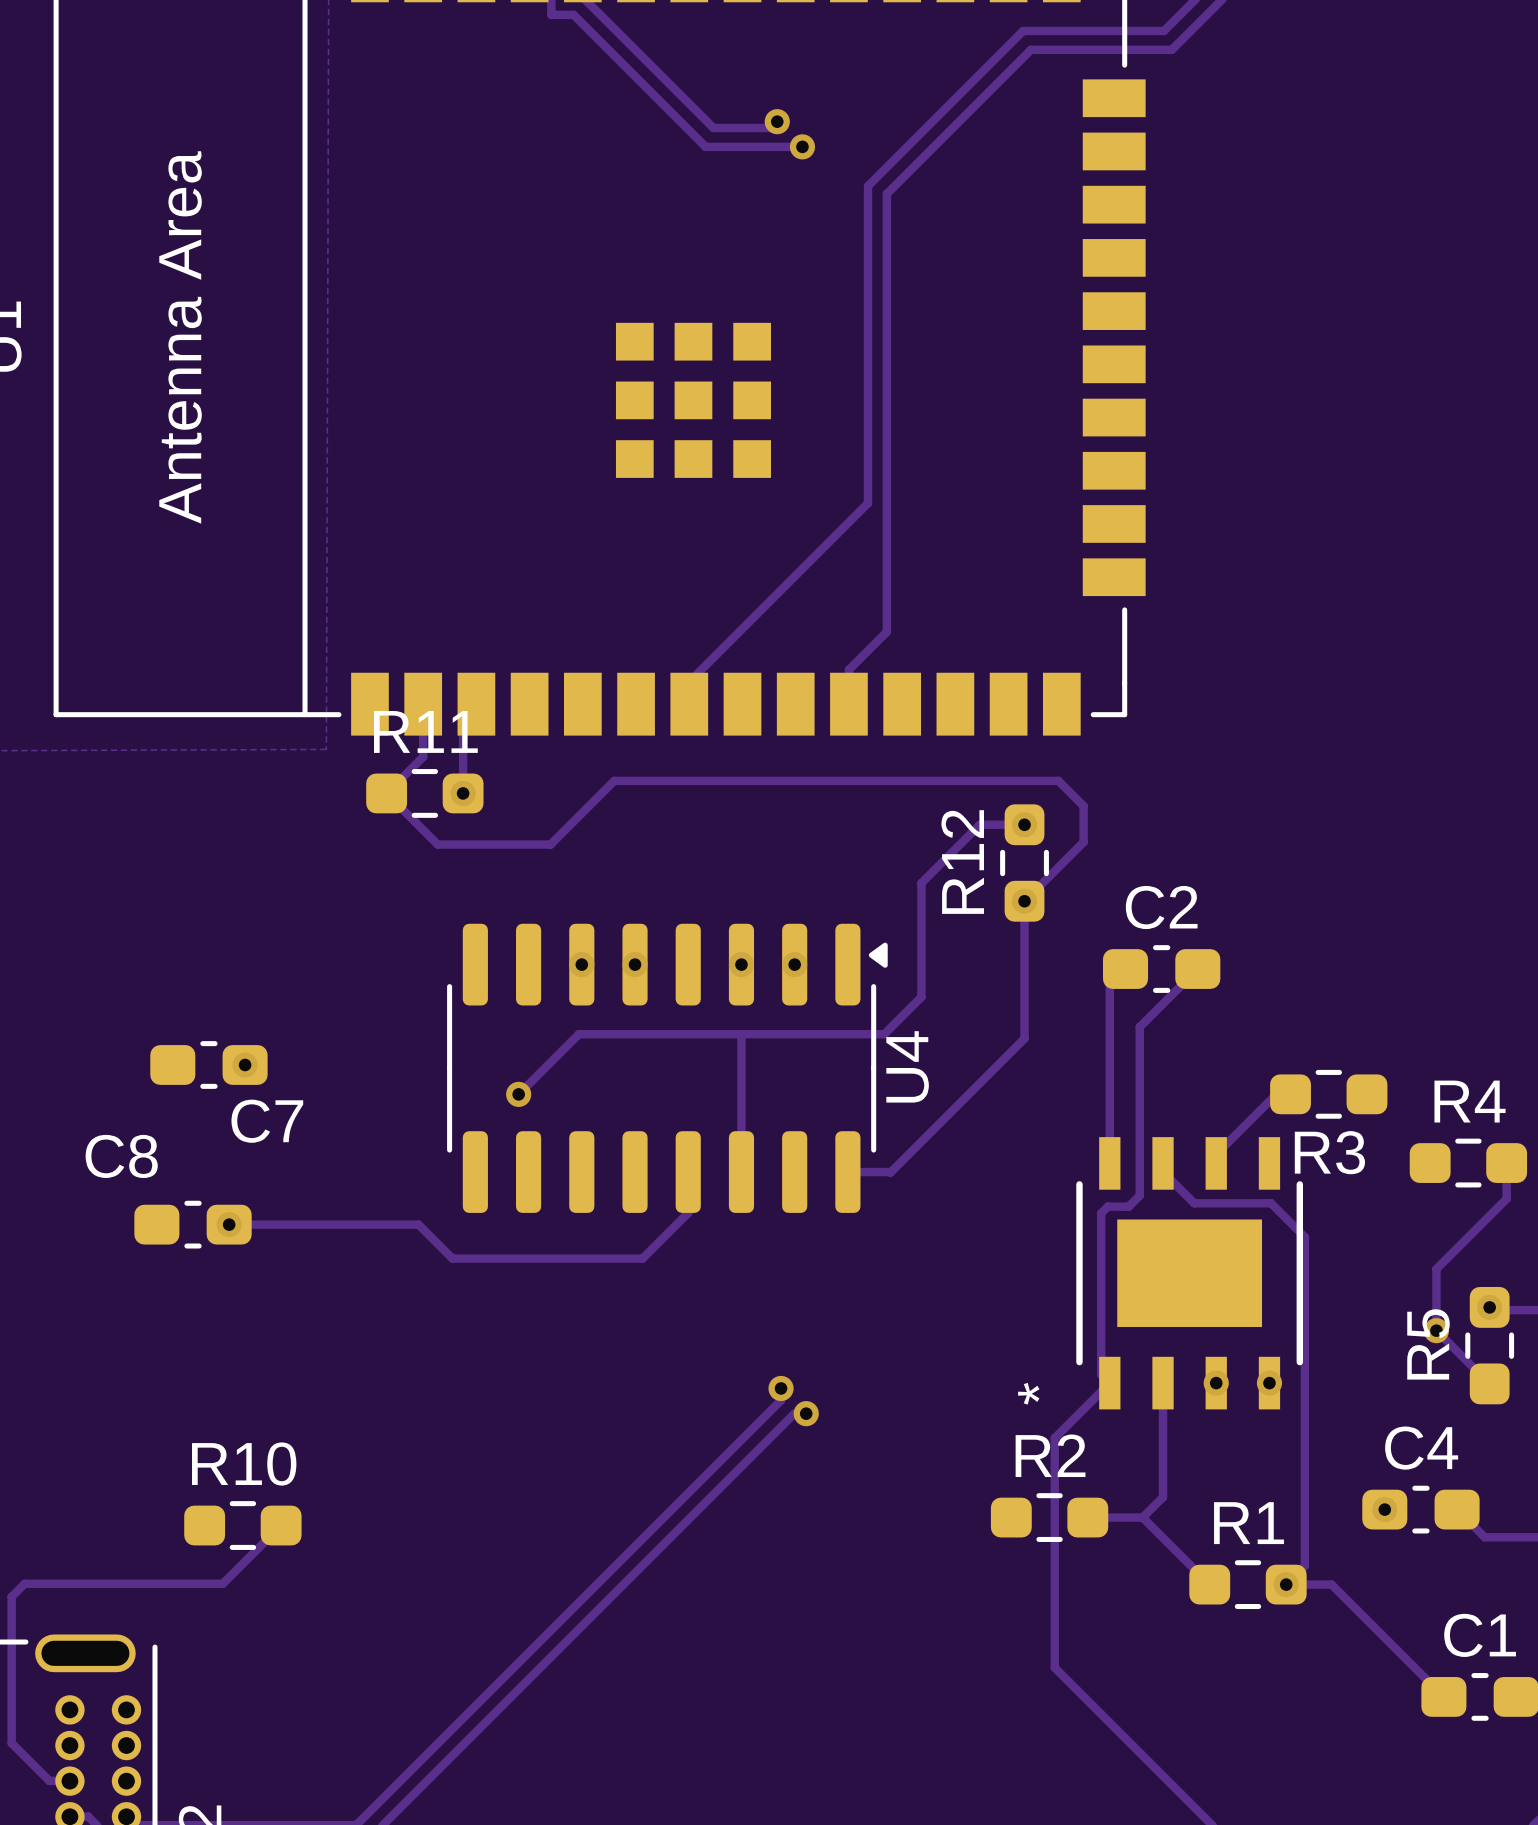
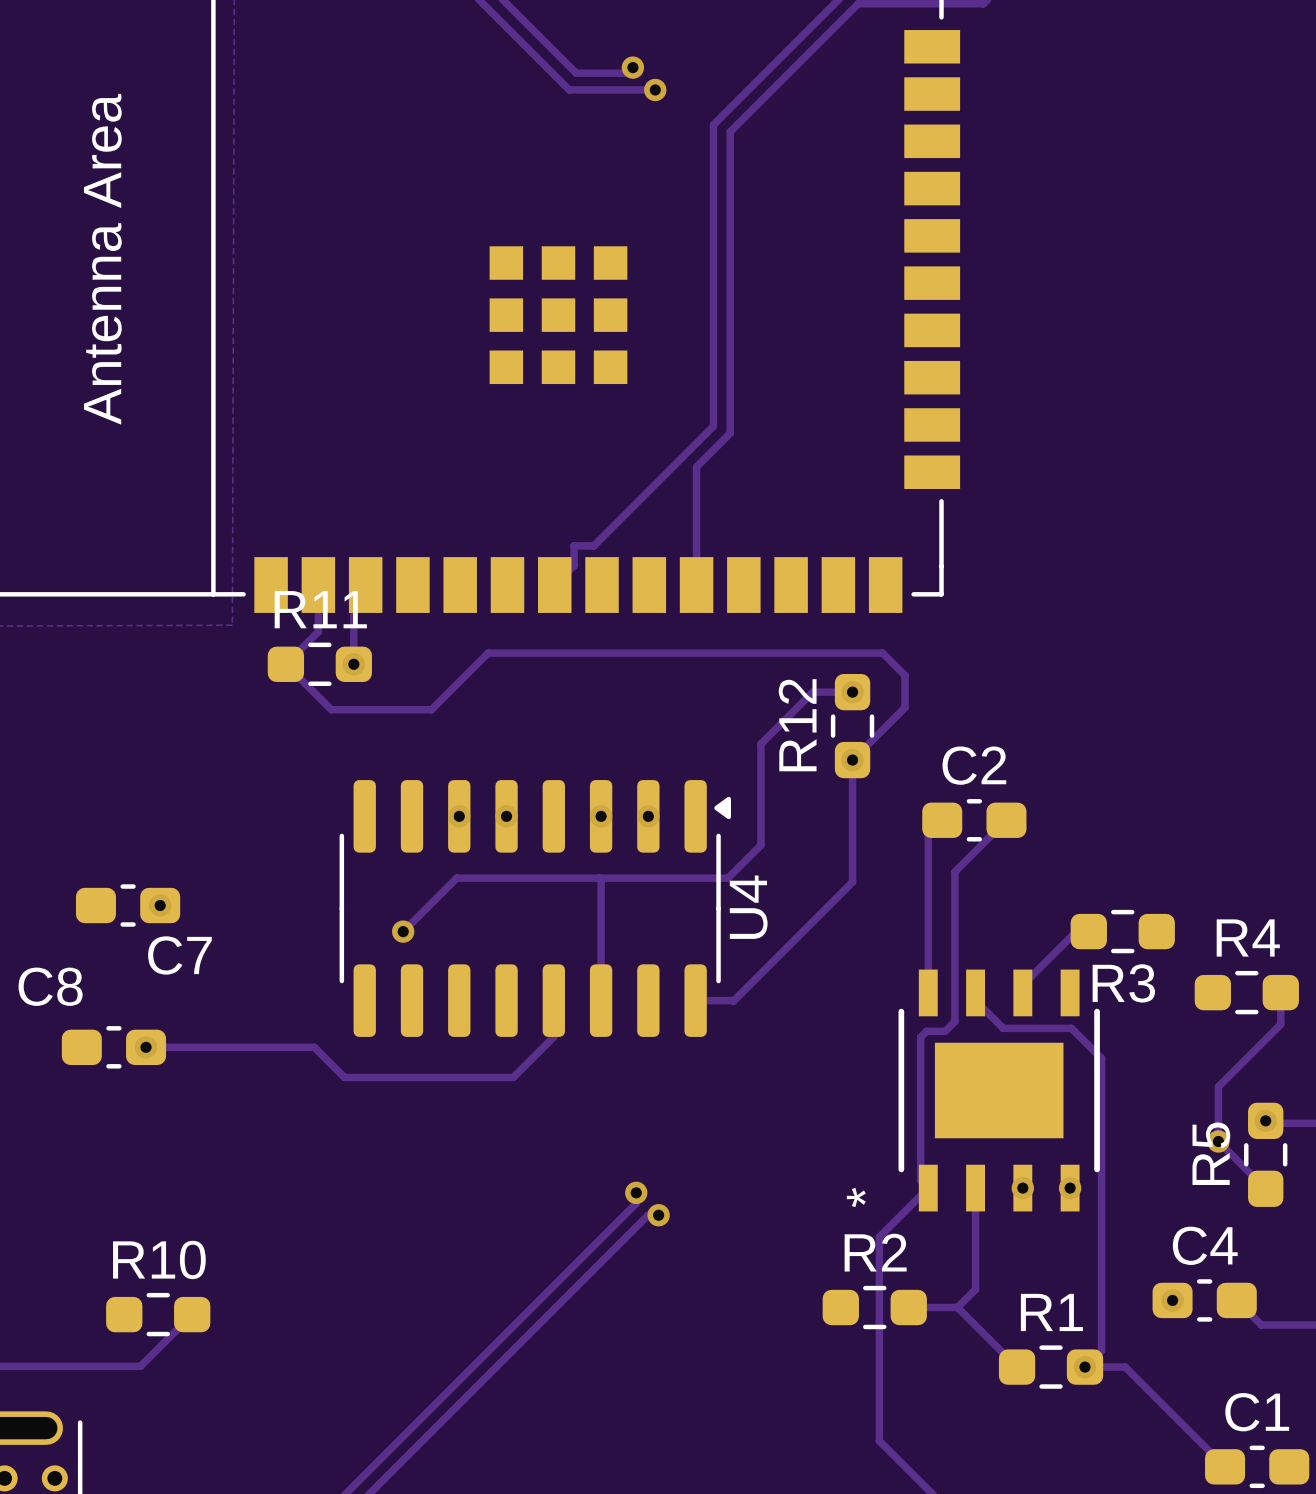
track: (868, 503) (689, 681) (689, 704) -> (713, 406) (713, 426) (593, 545) (574, 545) (574, 565) (554, 585)
track: (886, 533) (886, 631) (848, 669) -> (730, 433) (696, 466) (696, 554)

